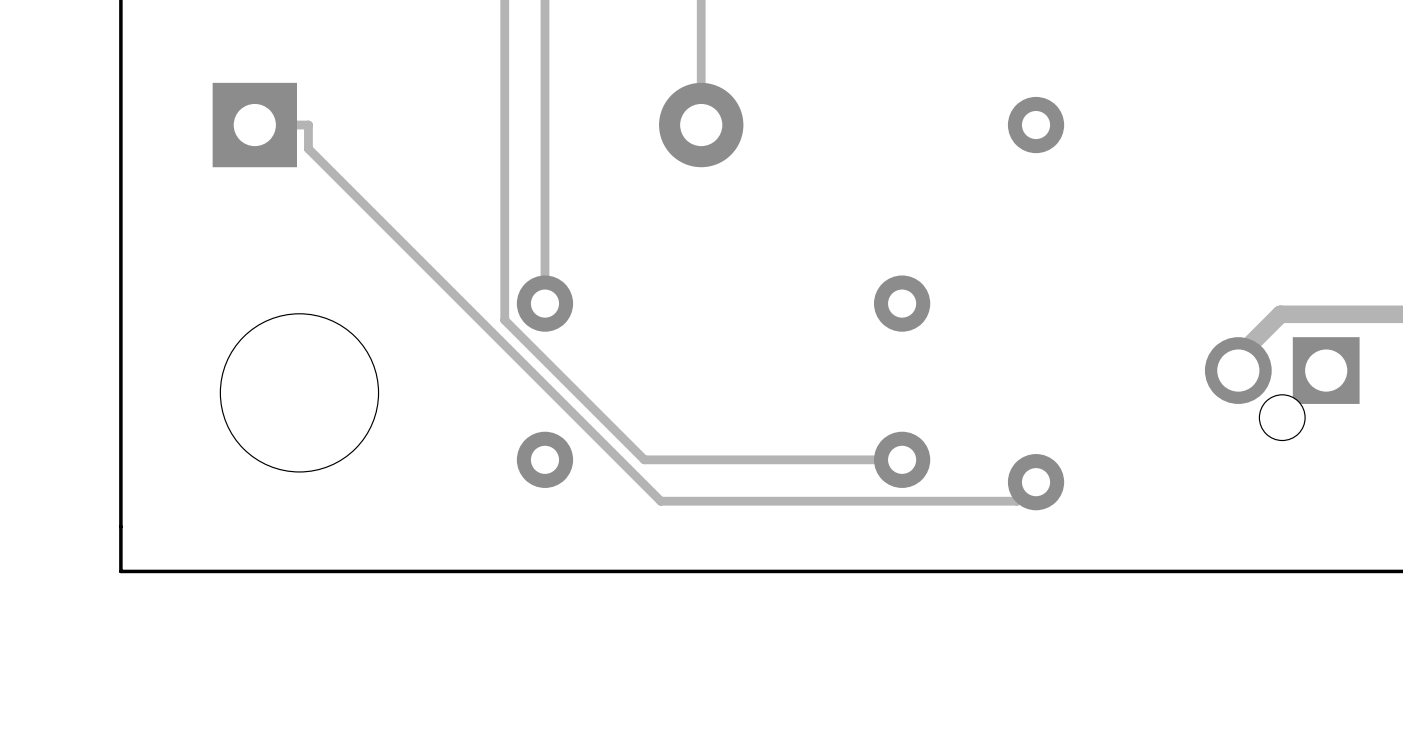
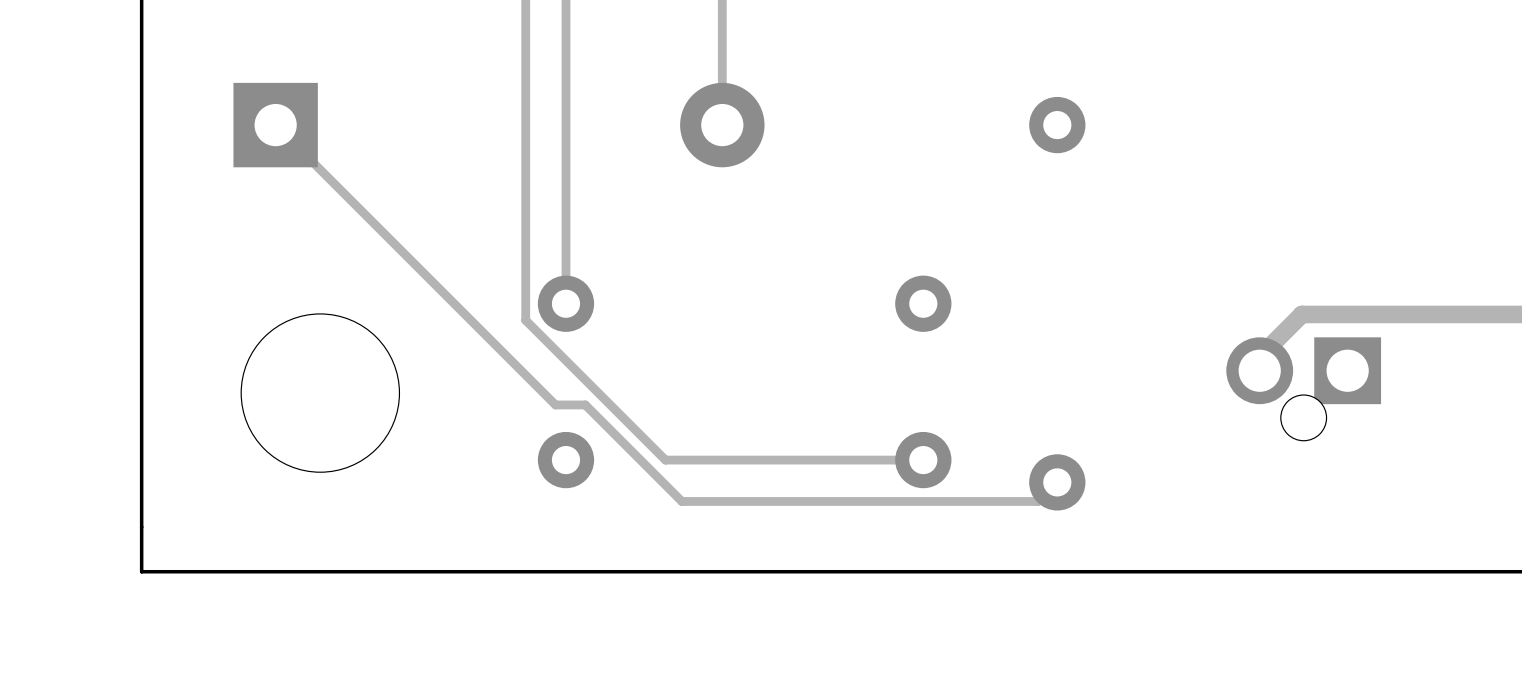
track: (254, 125) (308, 125) (308, 148) (564, 404) -> (275, 125) (555, 404) (585, 404)

